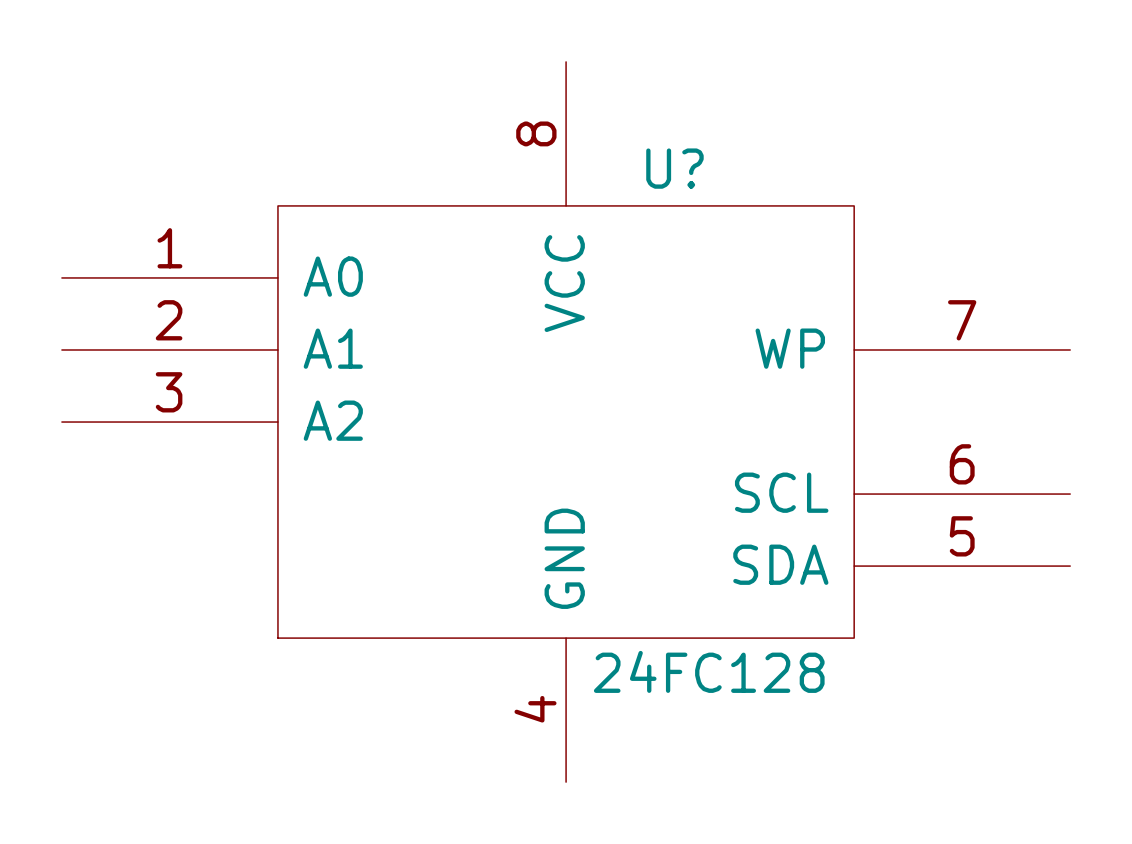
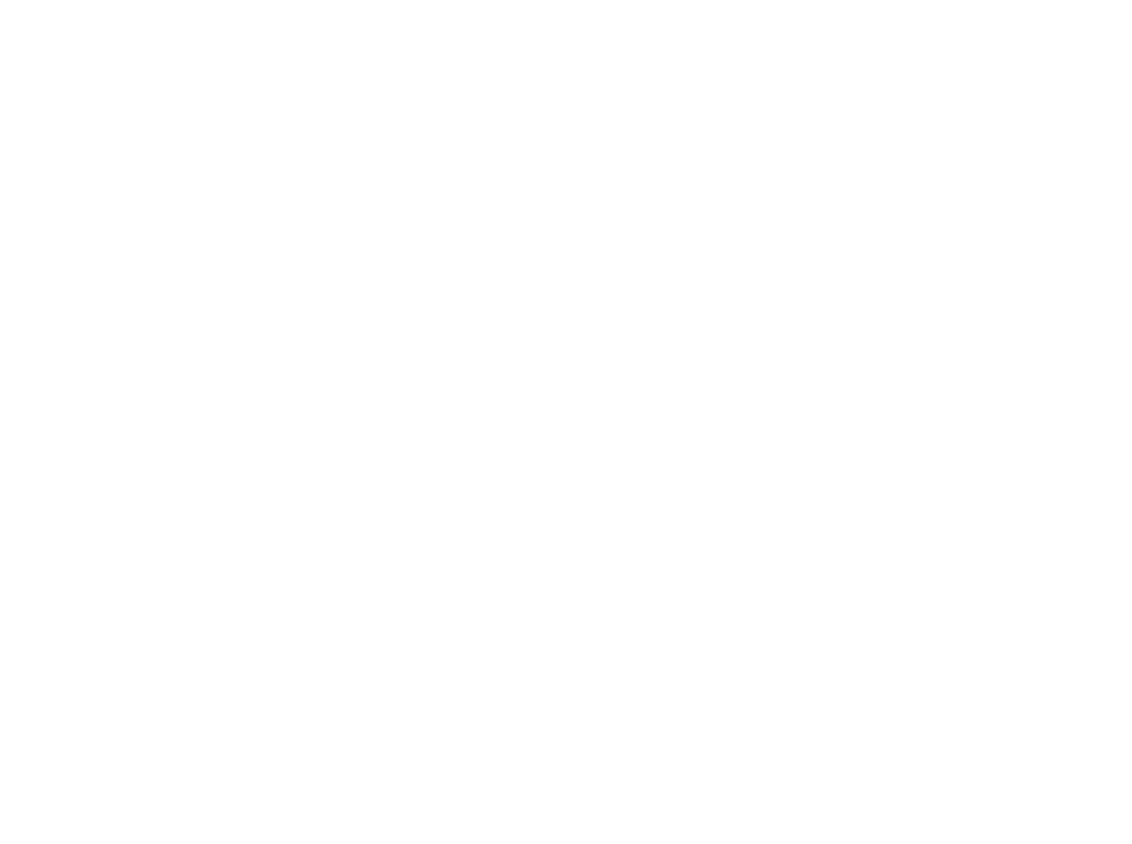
U?: 24FC128 (566, 422) -> none

